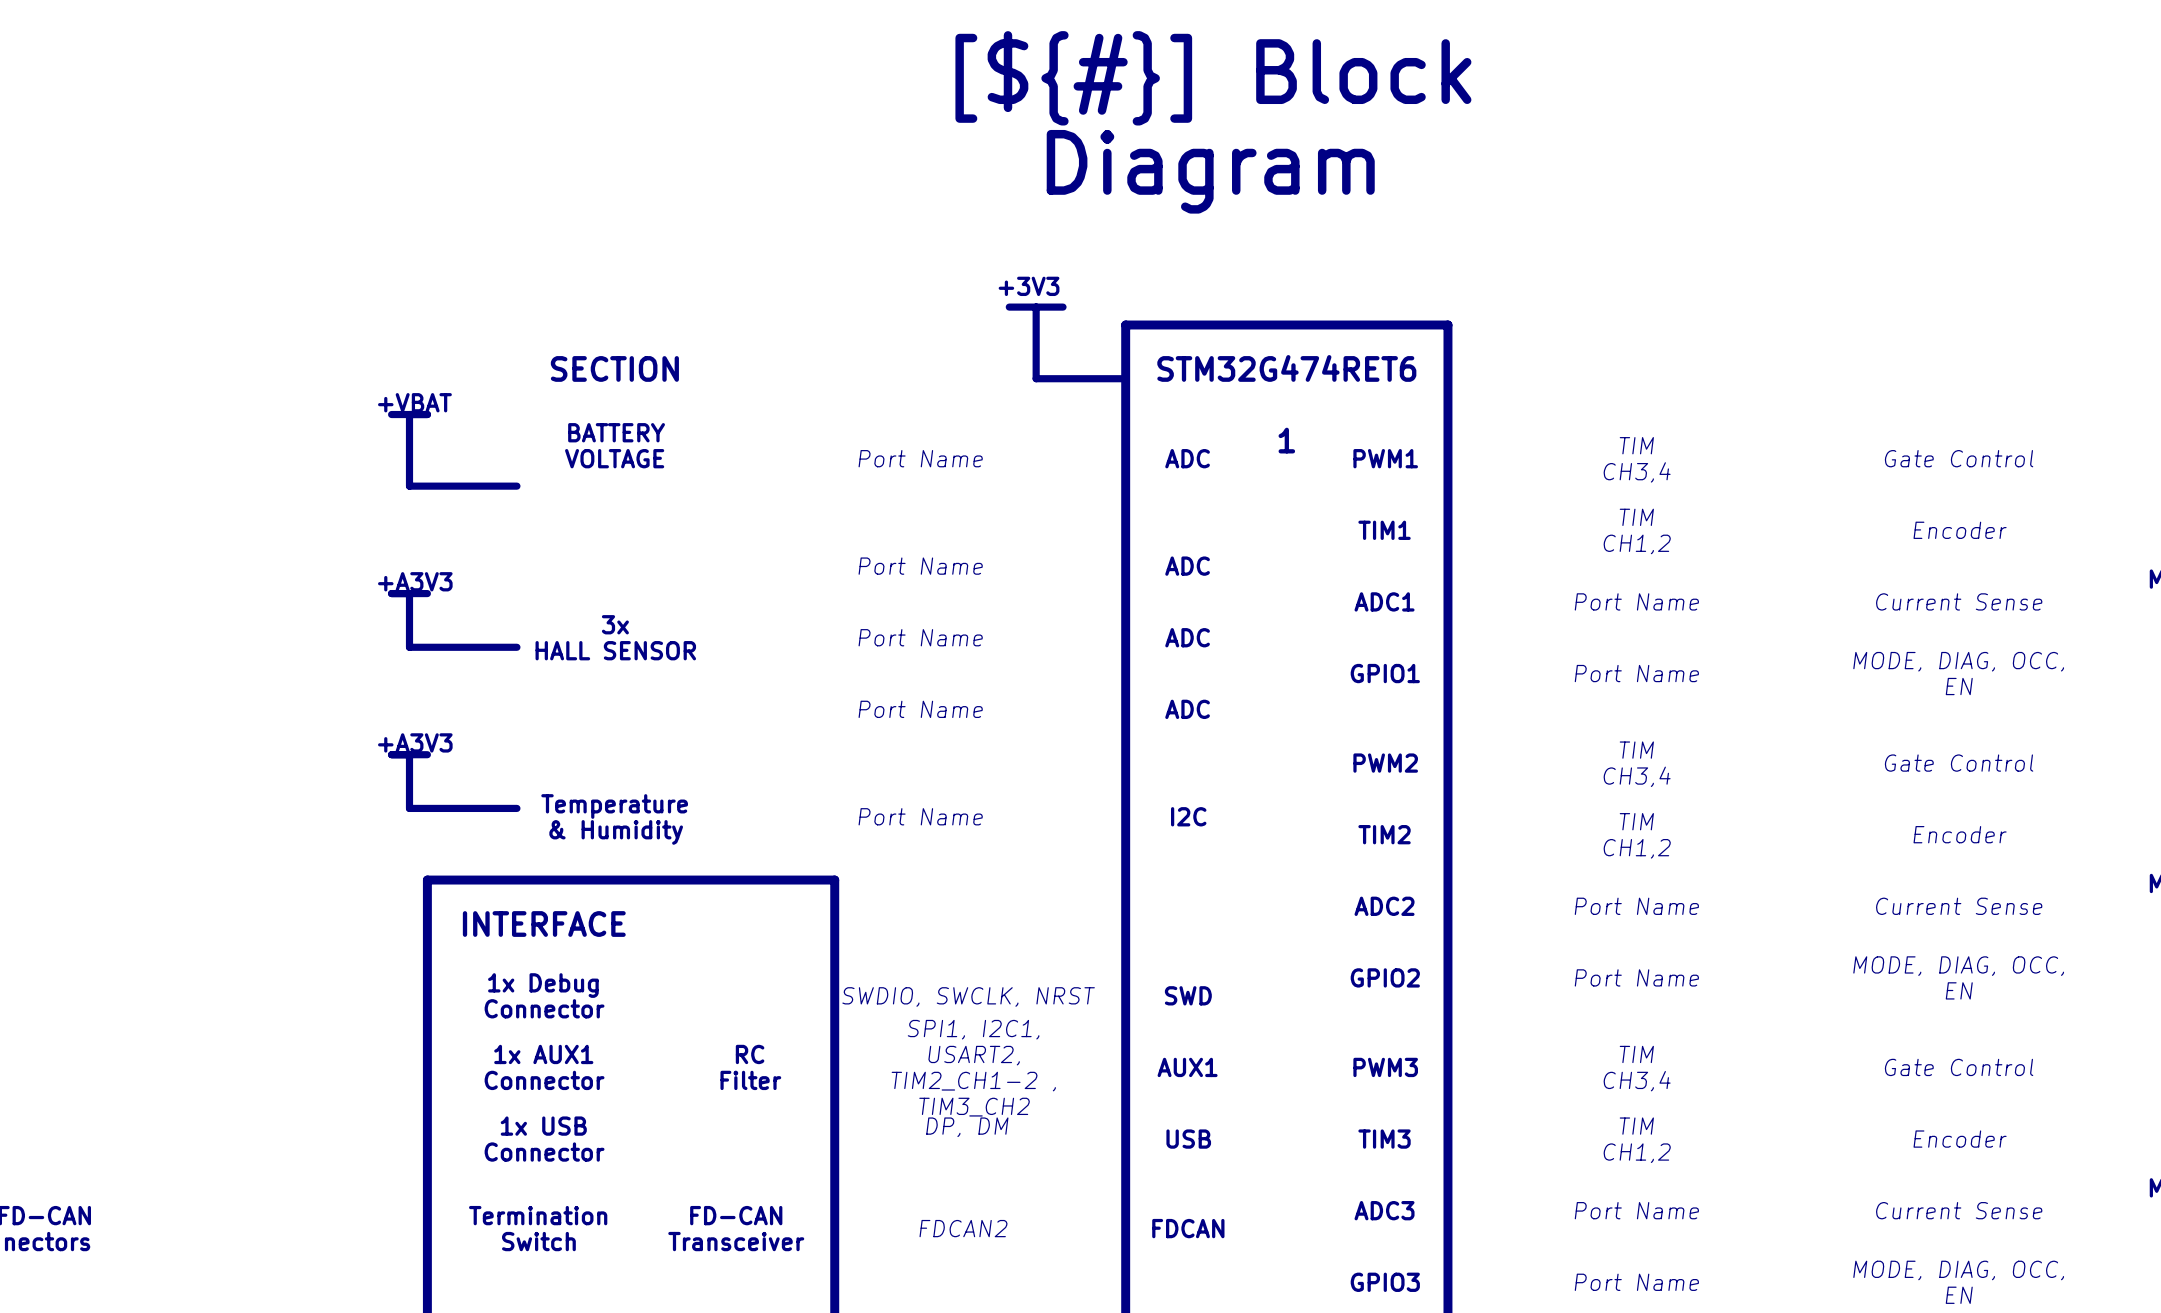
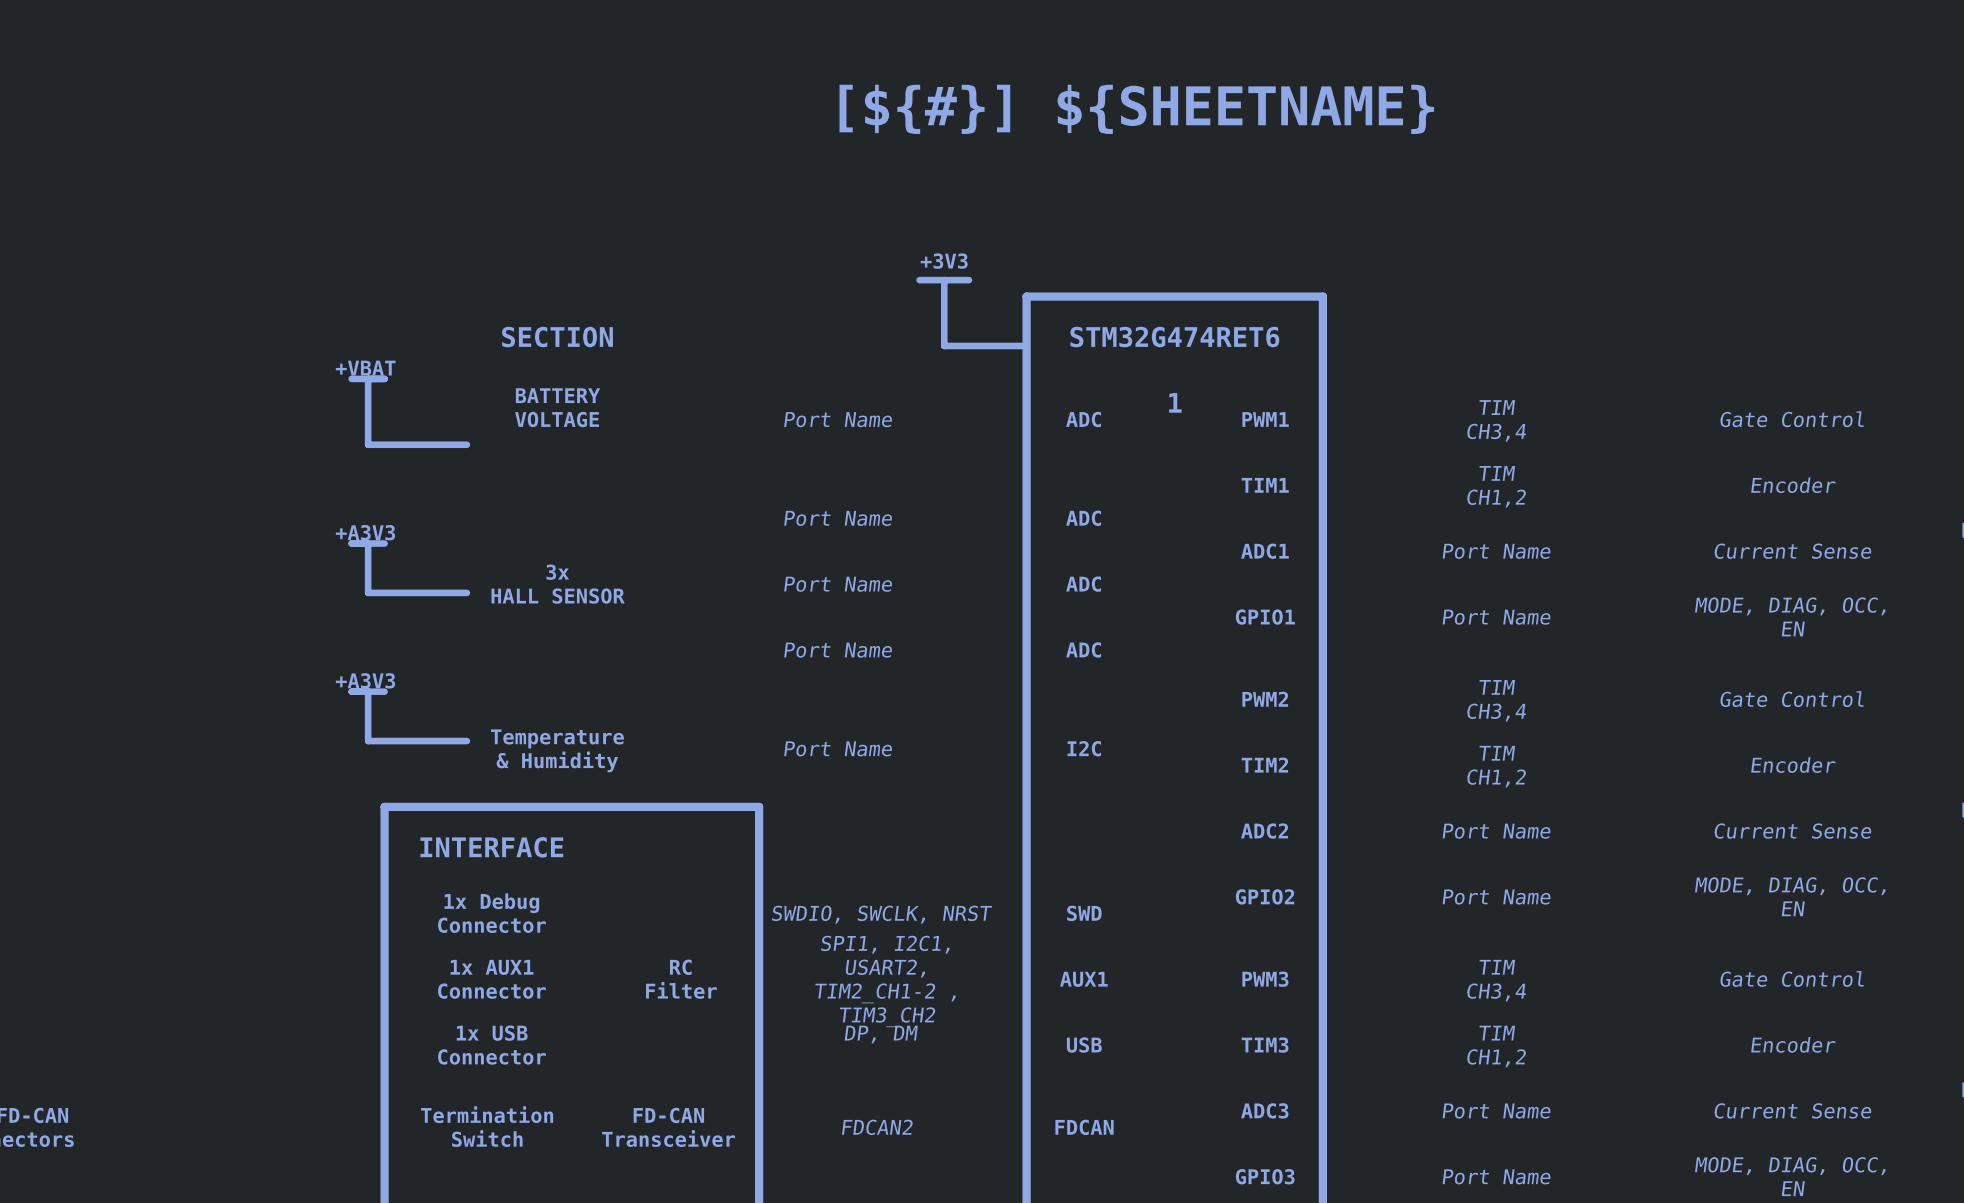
text: [${#}] Block (1213, 78) -> none
text: none -> [${#}] ${SHEETNAME} (1136, 109)
text: Diagram (1210, 171) -> none

